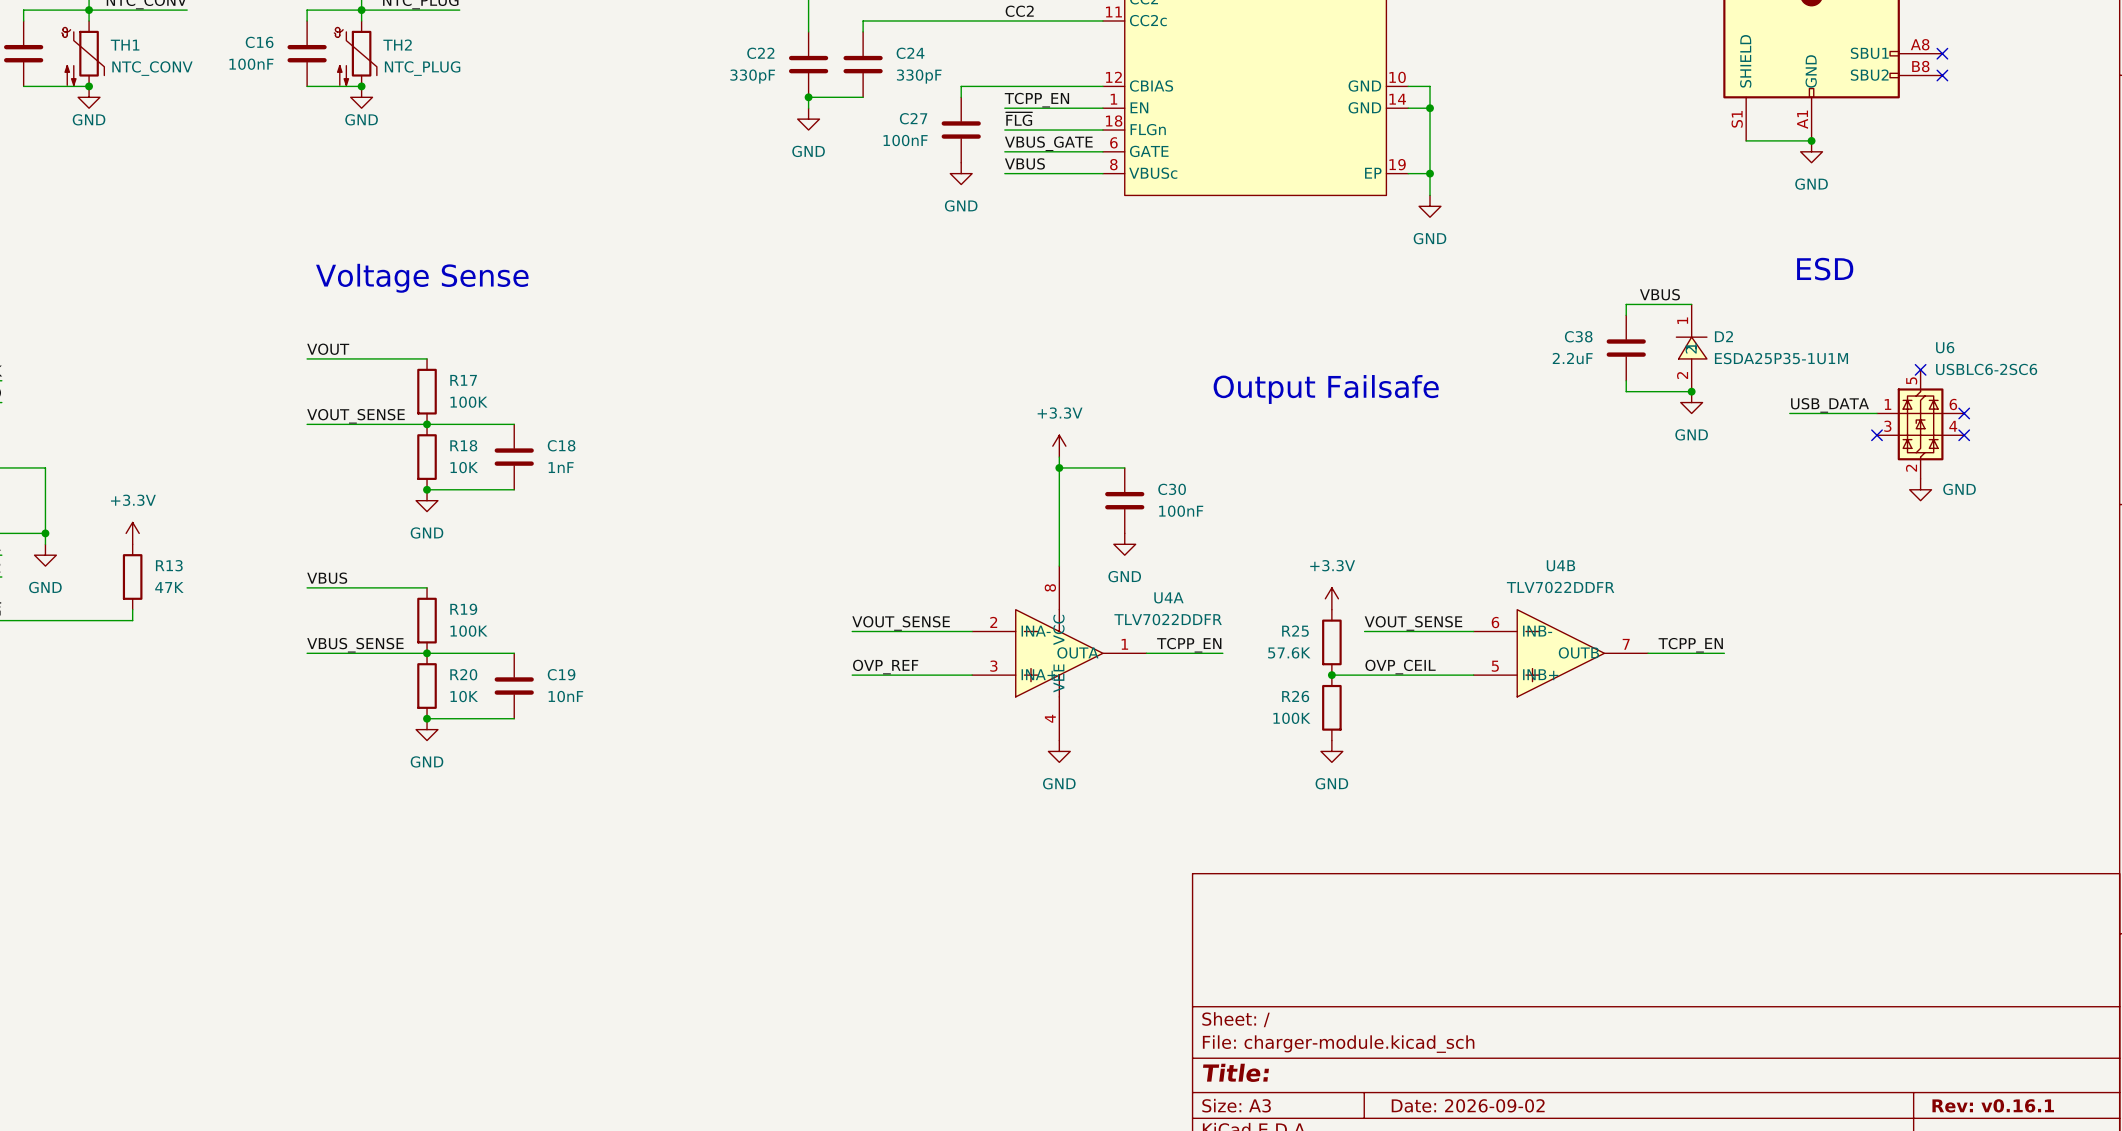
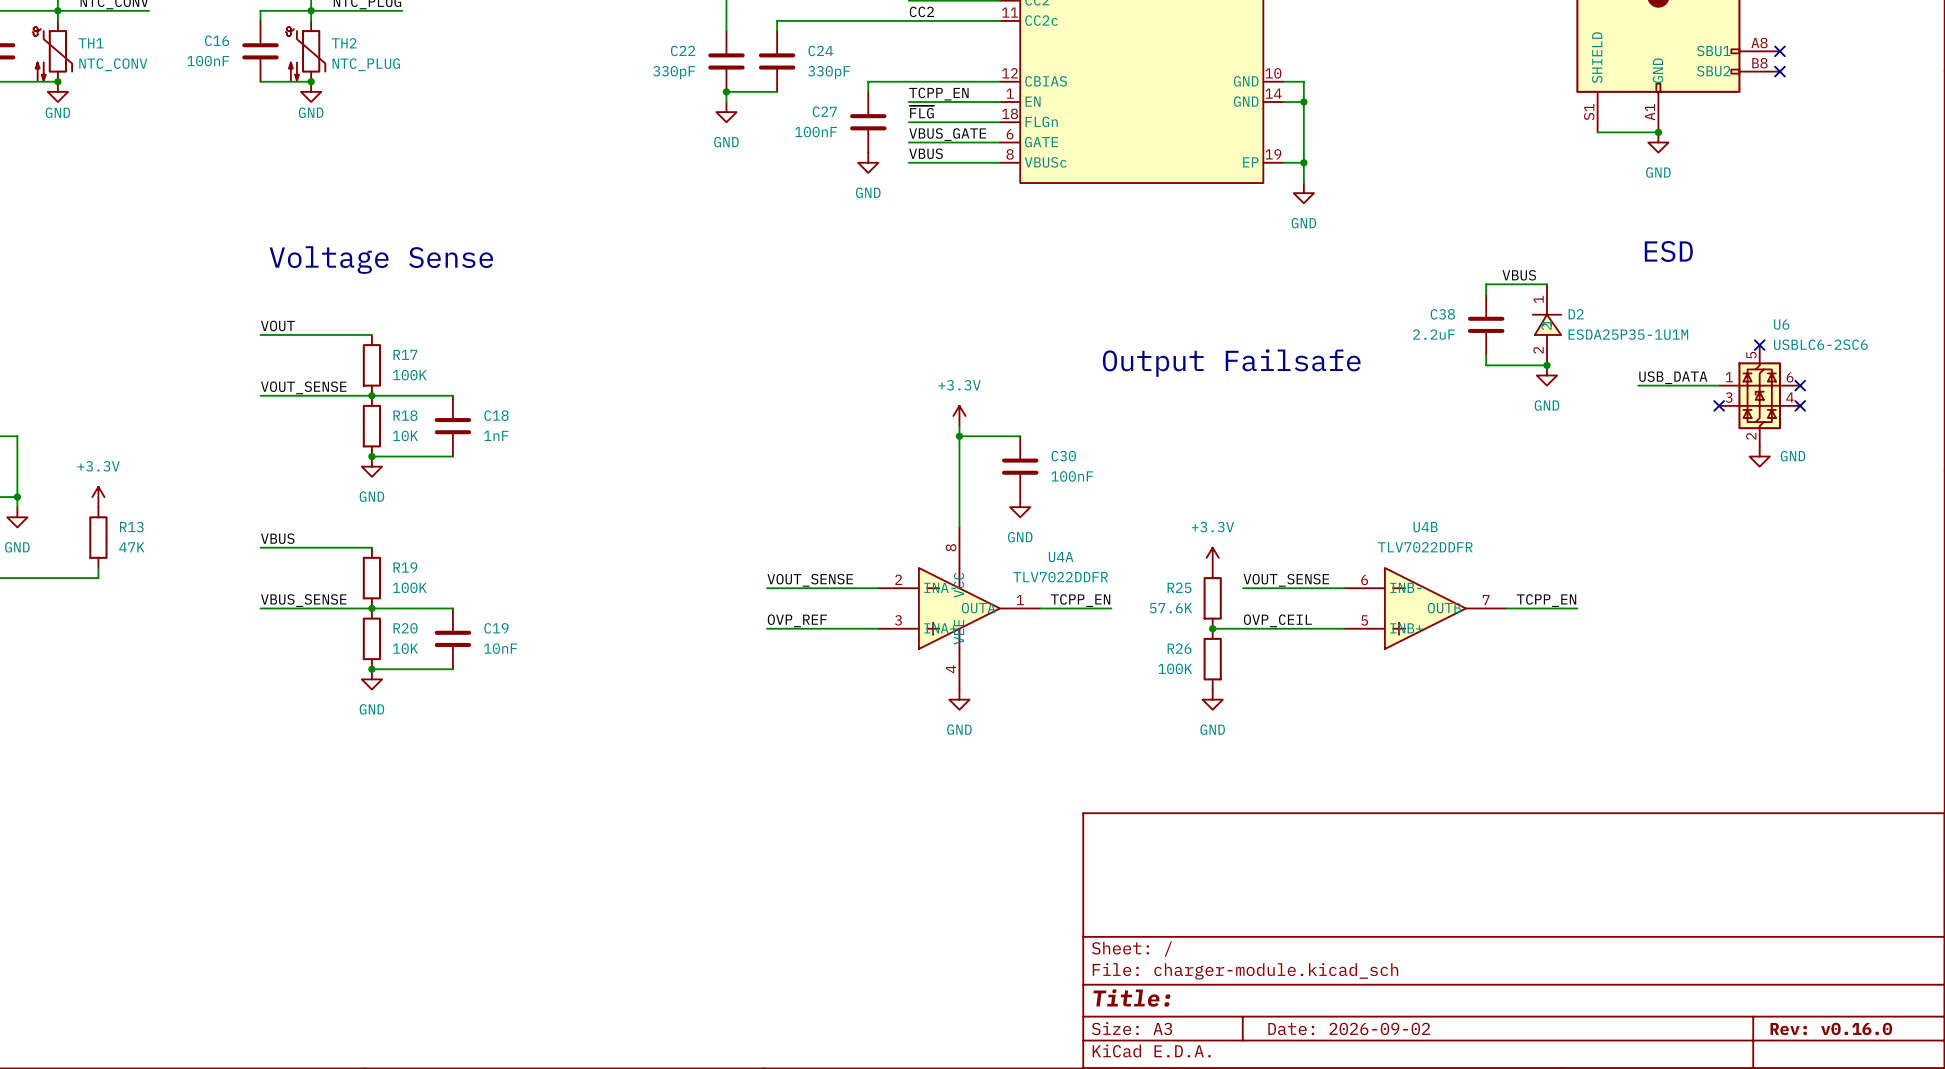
title block: Rev: v0.16.1 (1993, 1105) -> Rev: v0.16.0 (1831, 1028)

